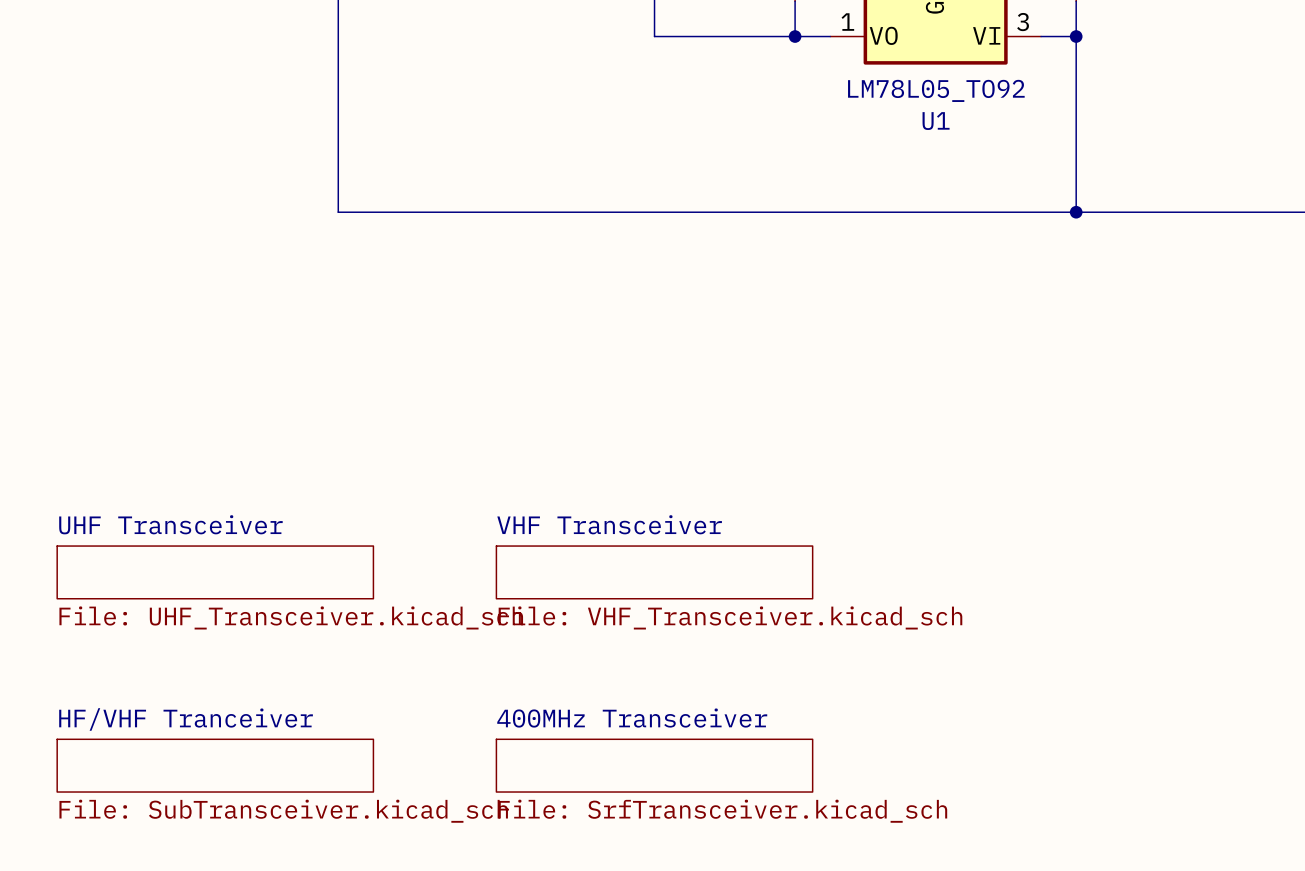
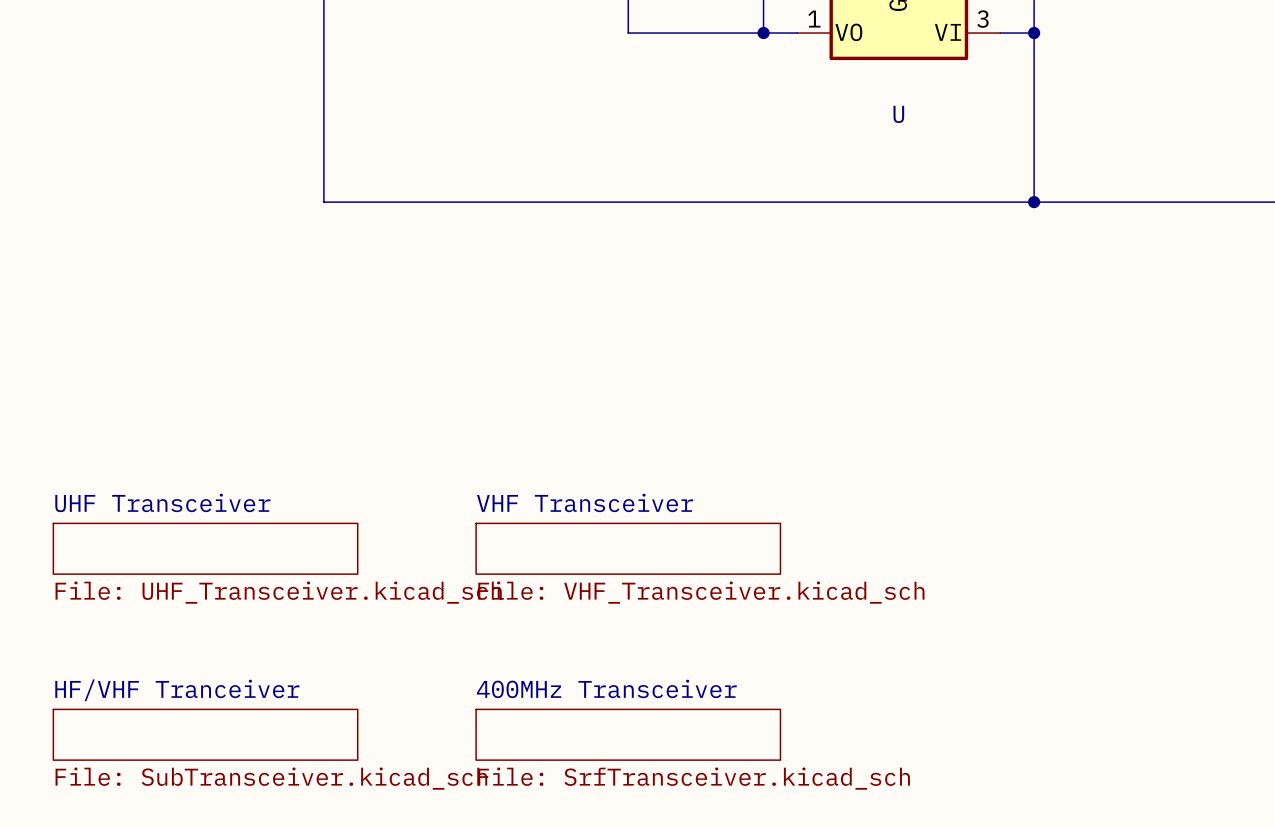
U1 value: LM78L05_TO92 (936, 90) -> none
U1 name: U1 (936, 121) -> U (898, 114)

